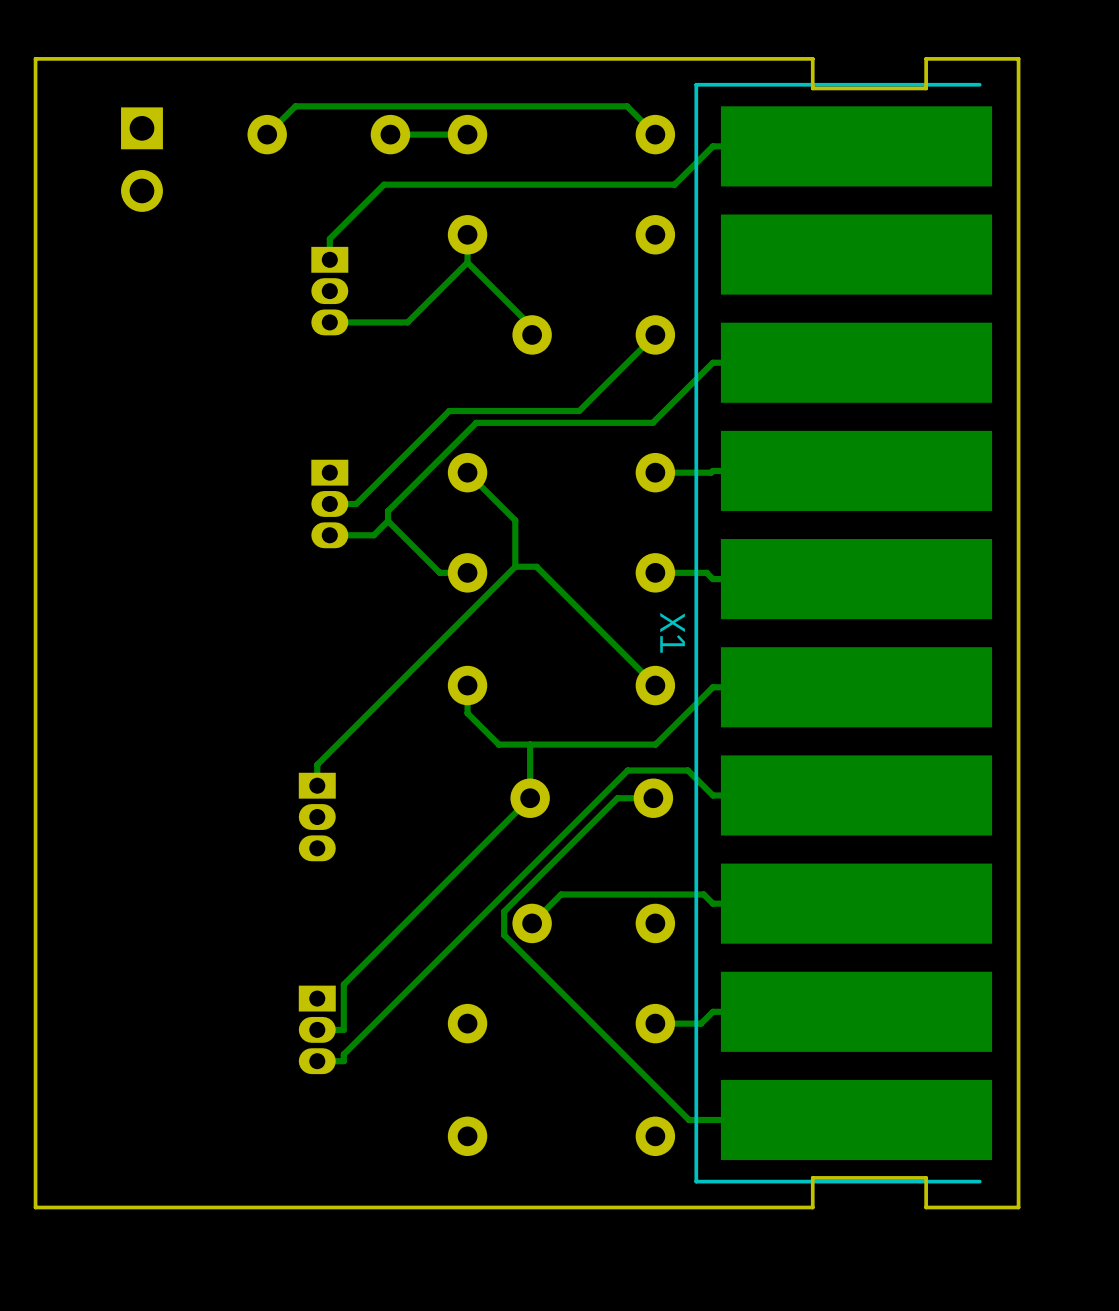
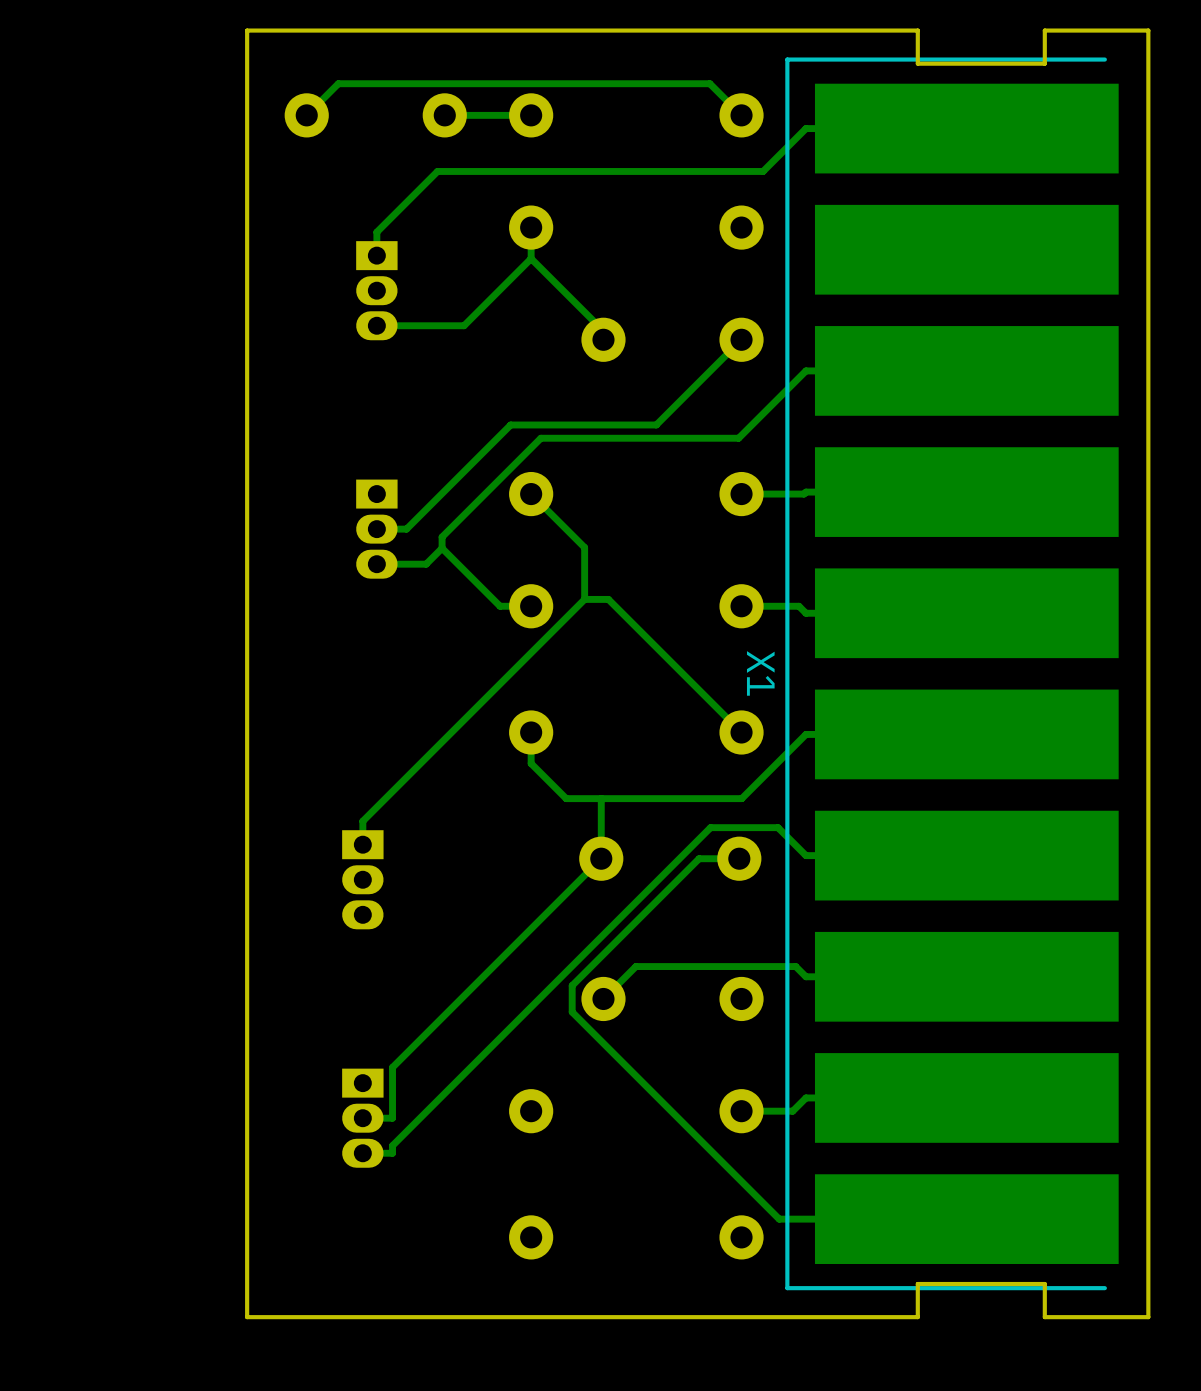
board edge: (213, 58) (35, 58) (35, 1207) (213, 1207) -> (247, 30) (247, 1317)
part: (141, 159) -> none

